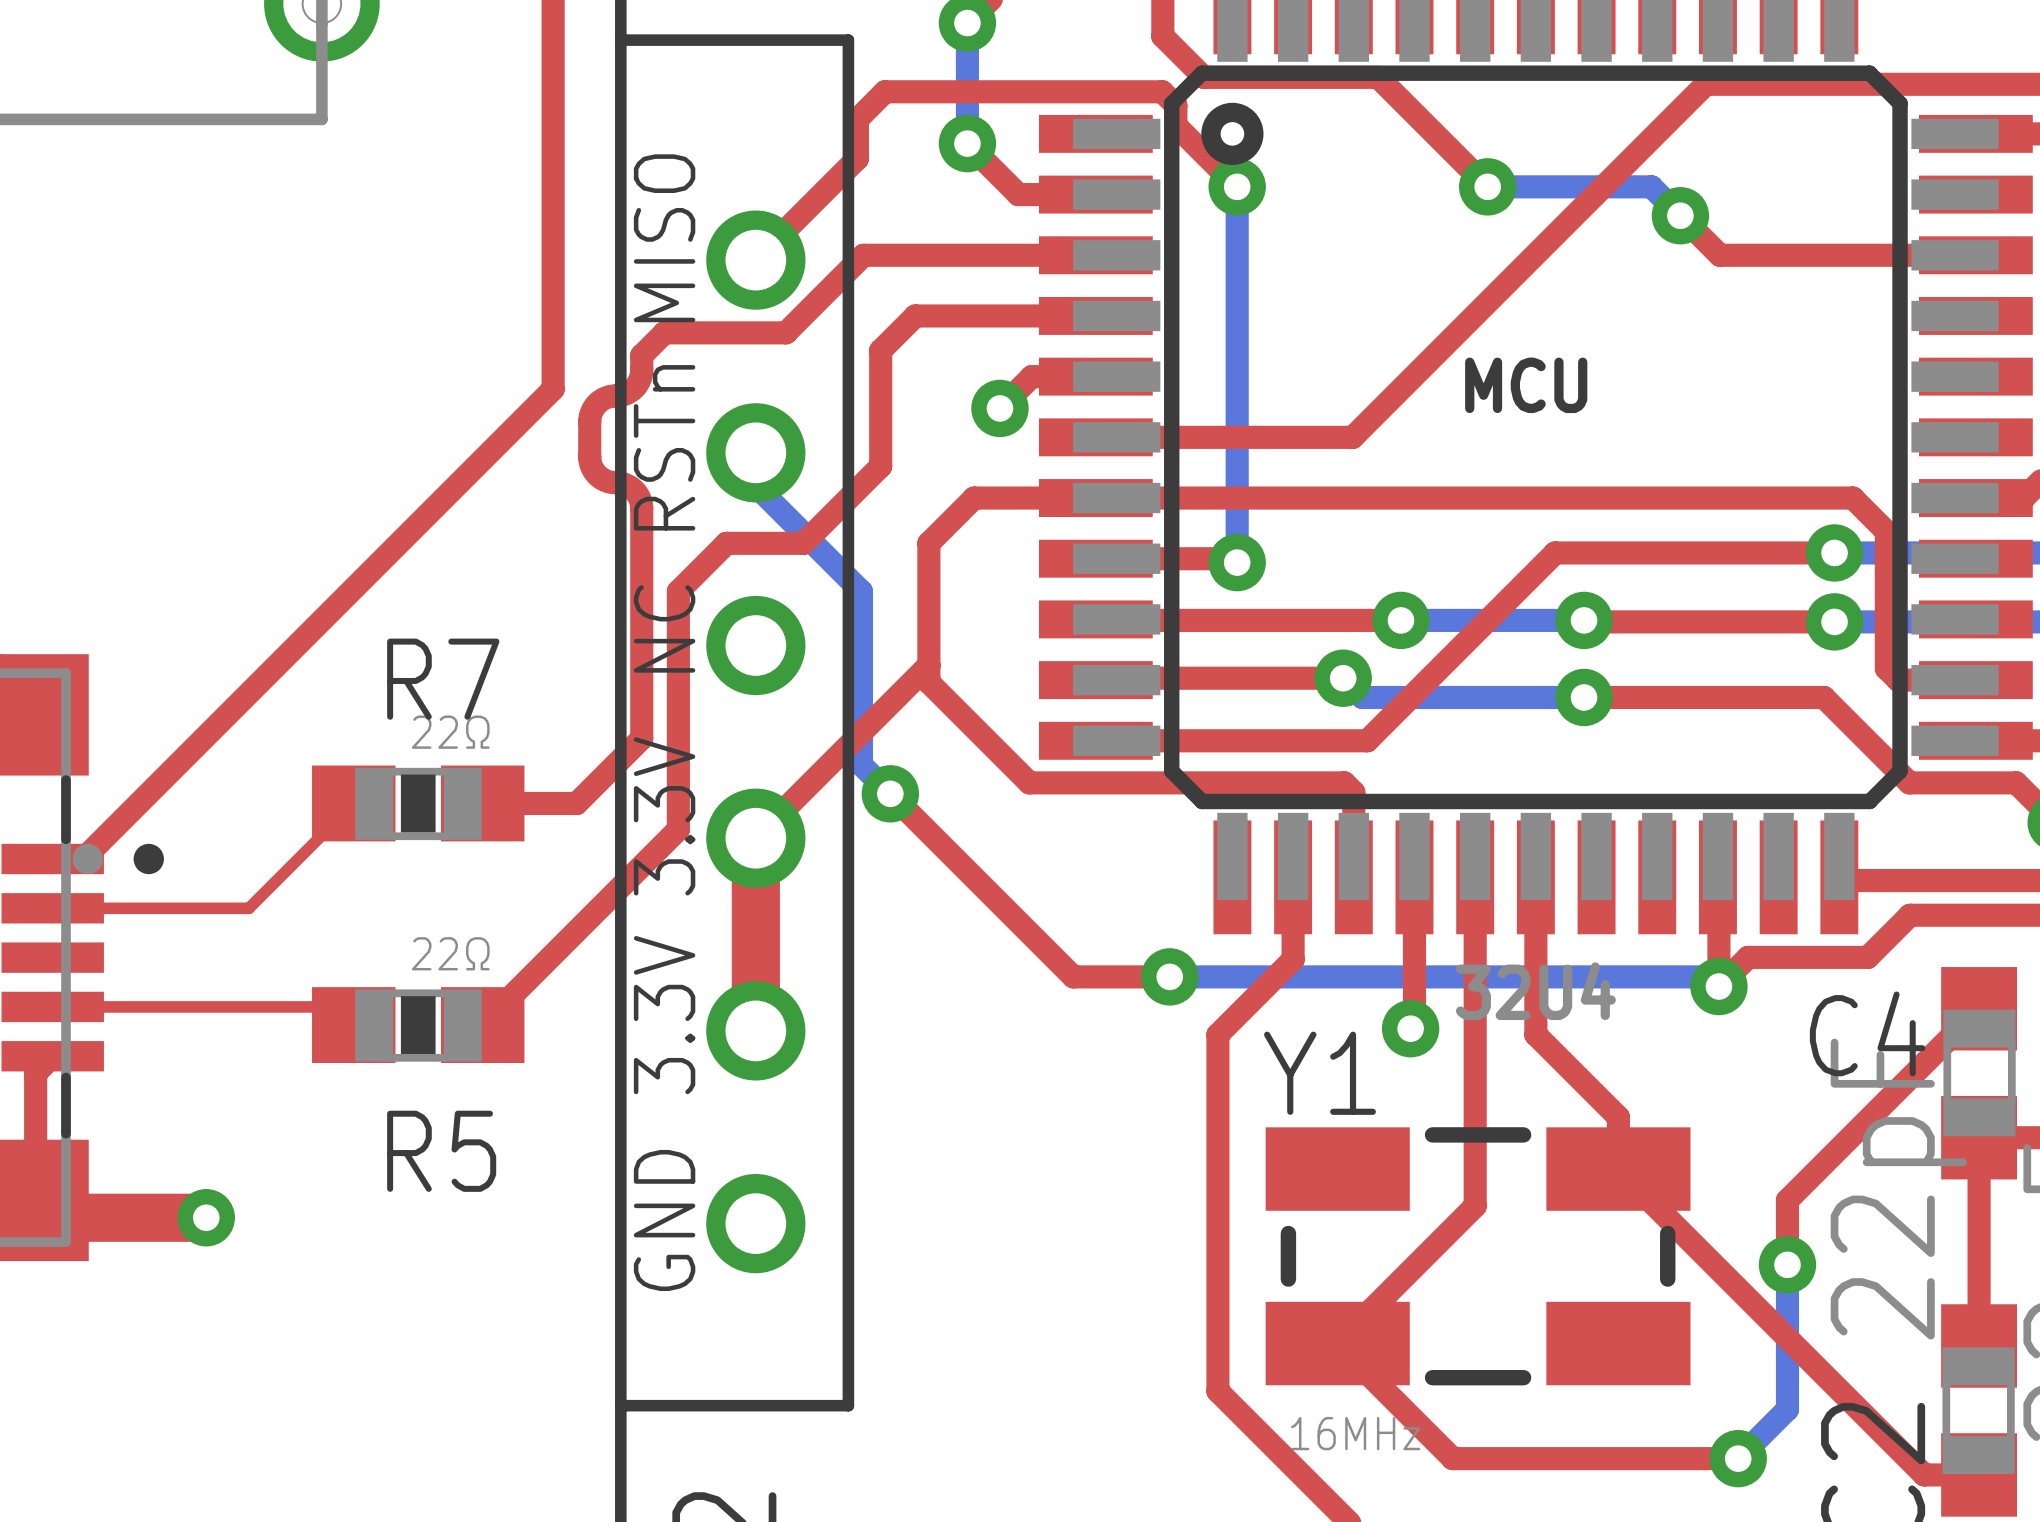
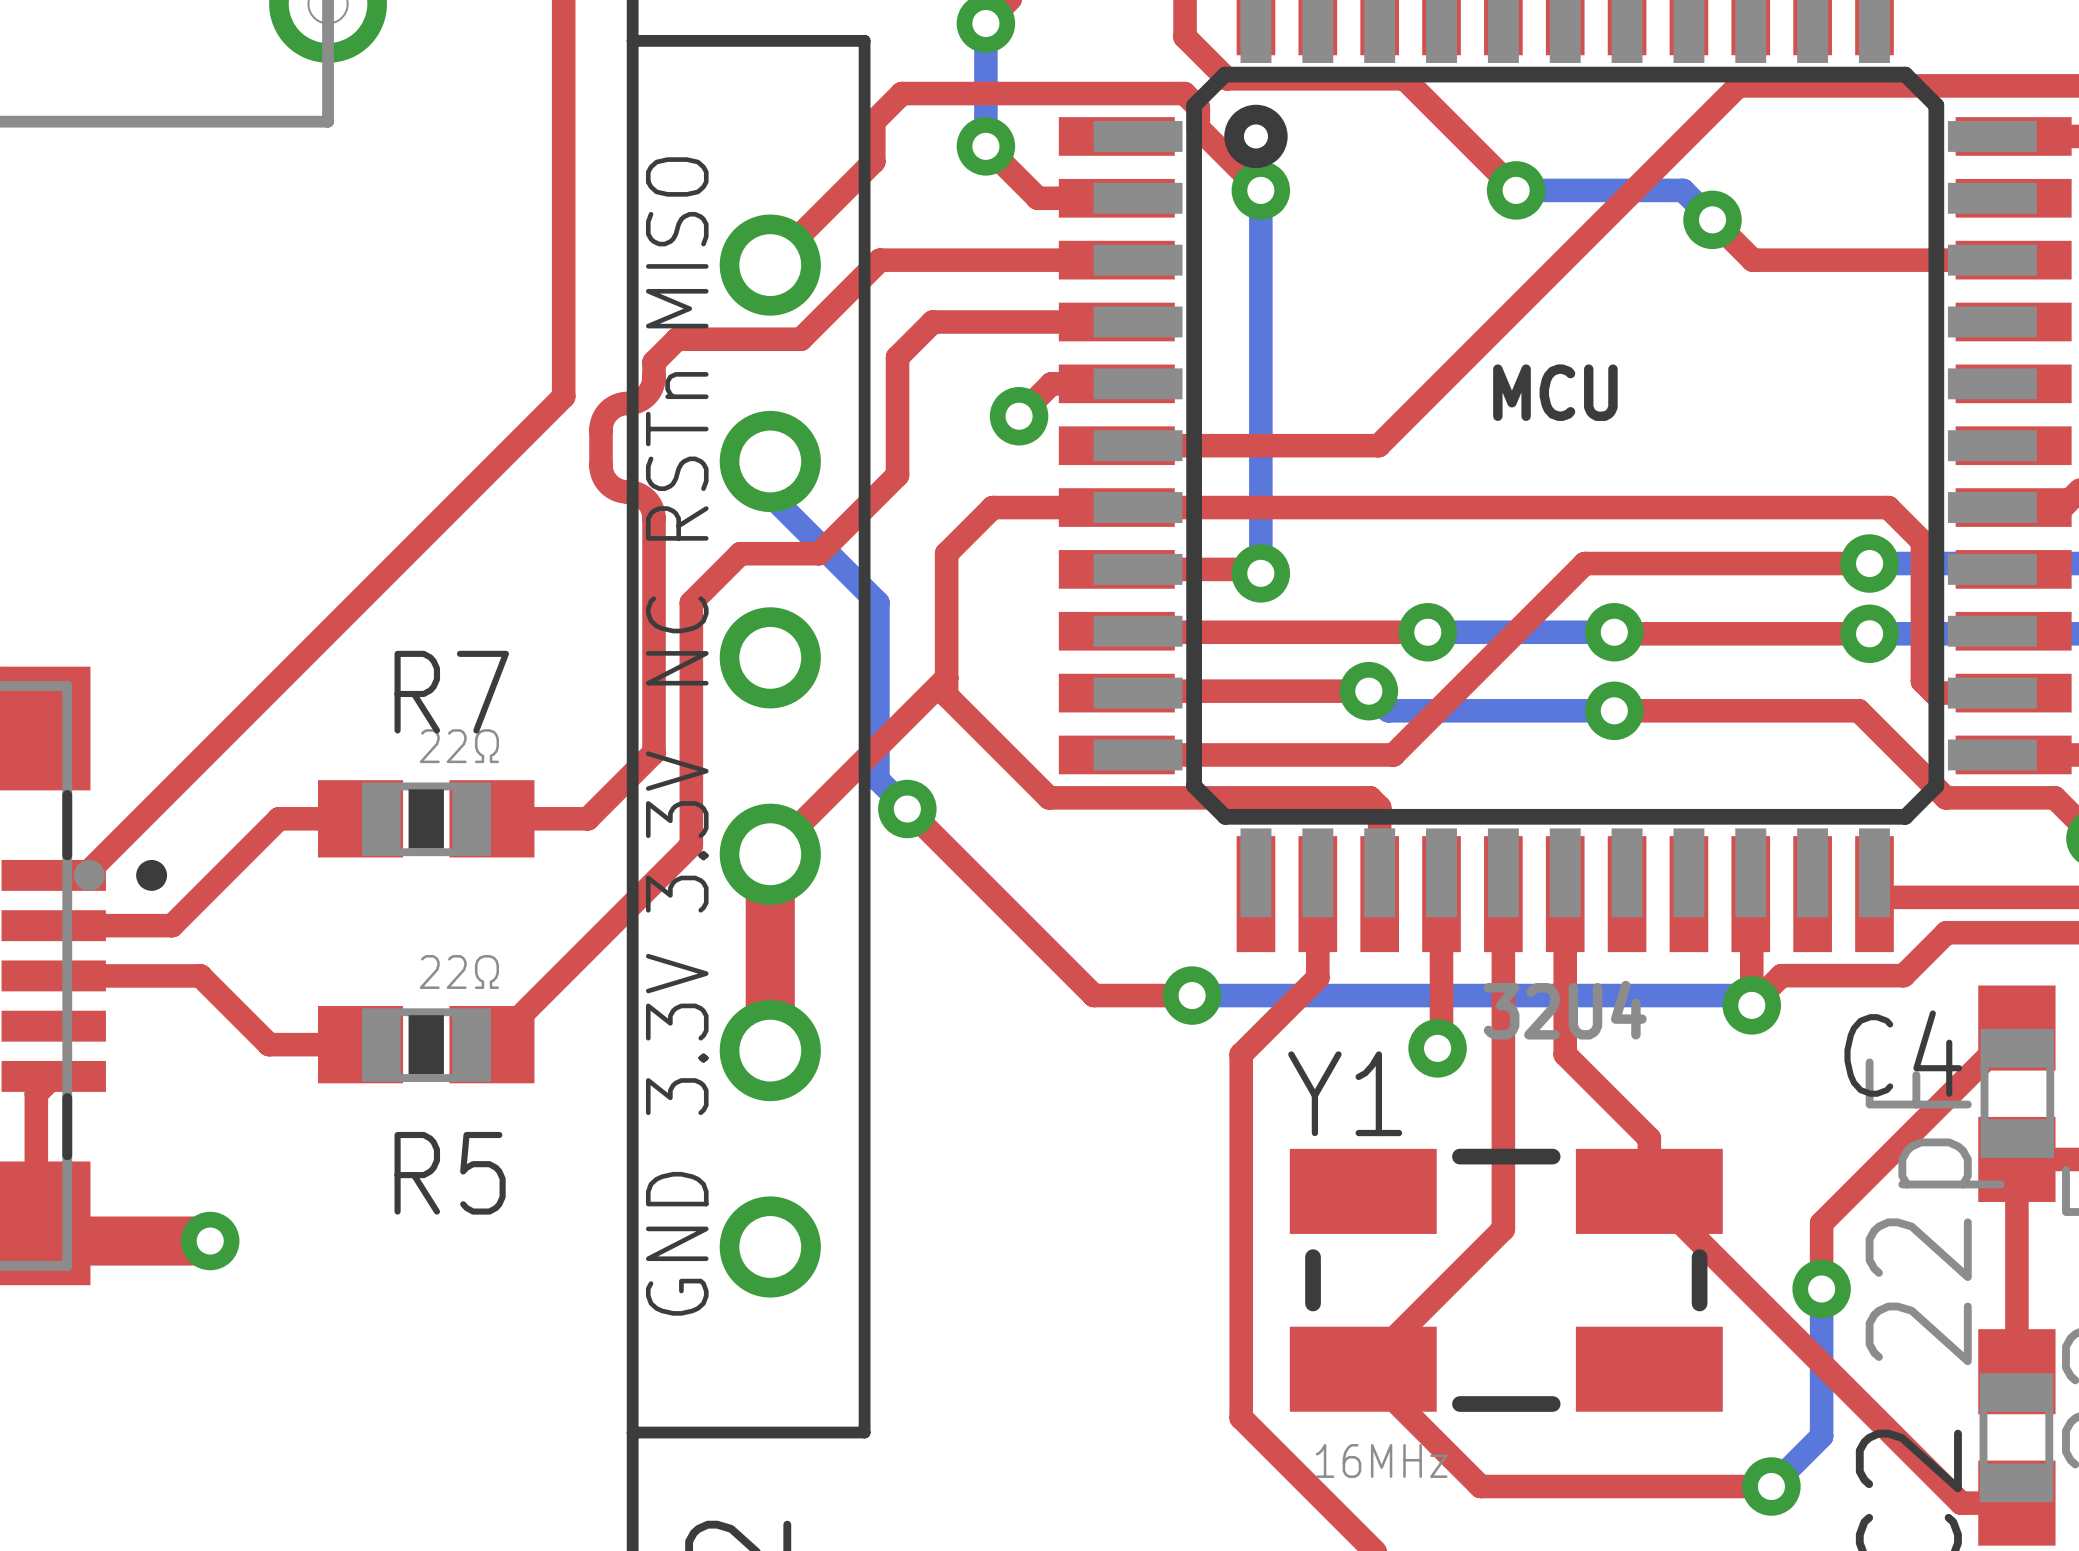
top track: (353, 803) (248, 908) (168, 908) -> (360, 818) (278, 818) (172, 925)
top track width: thin (52, 908) (168, 908) -> thick (53, 925) (172, 925)
top track: (52, 1006) (335, 1006) (353, 1025) -> (53, 975) (200, 975) (269, 1044) (360, 1044)

